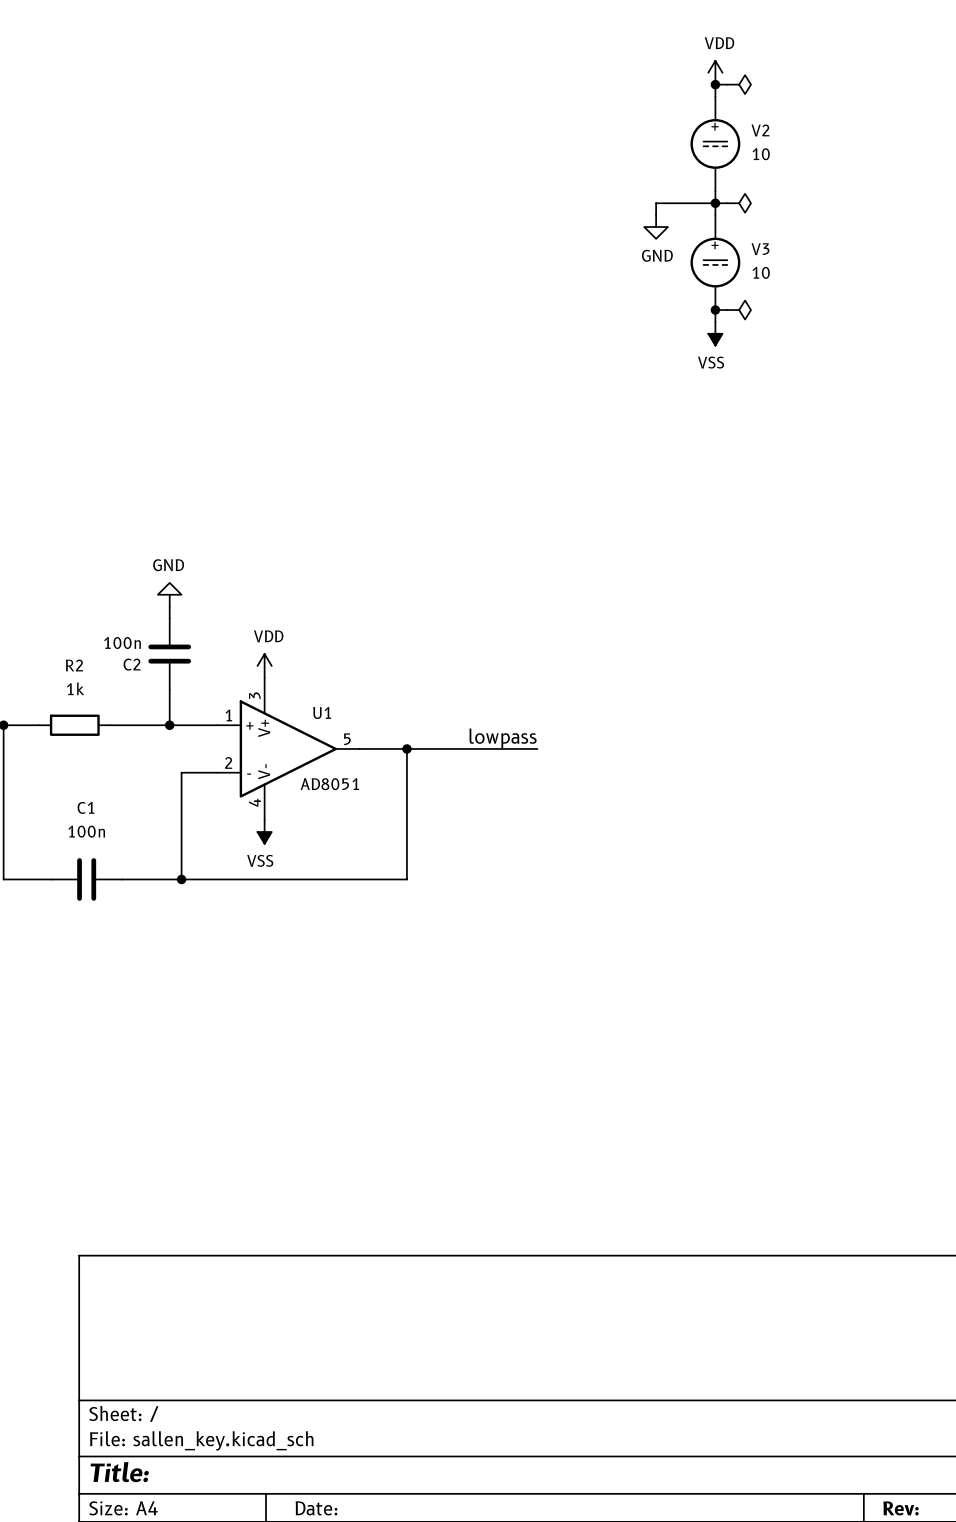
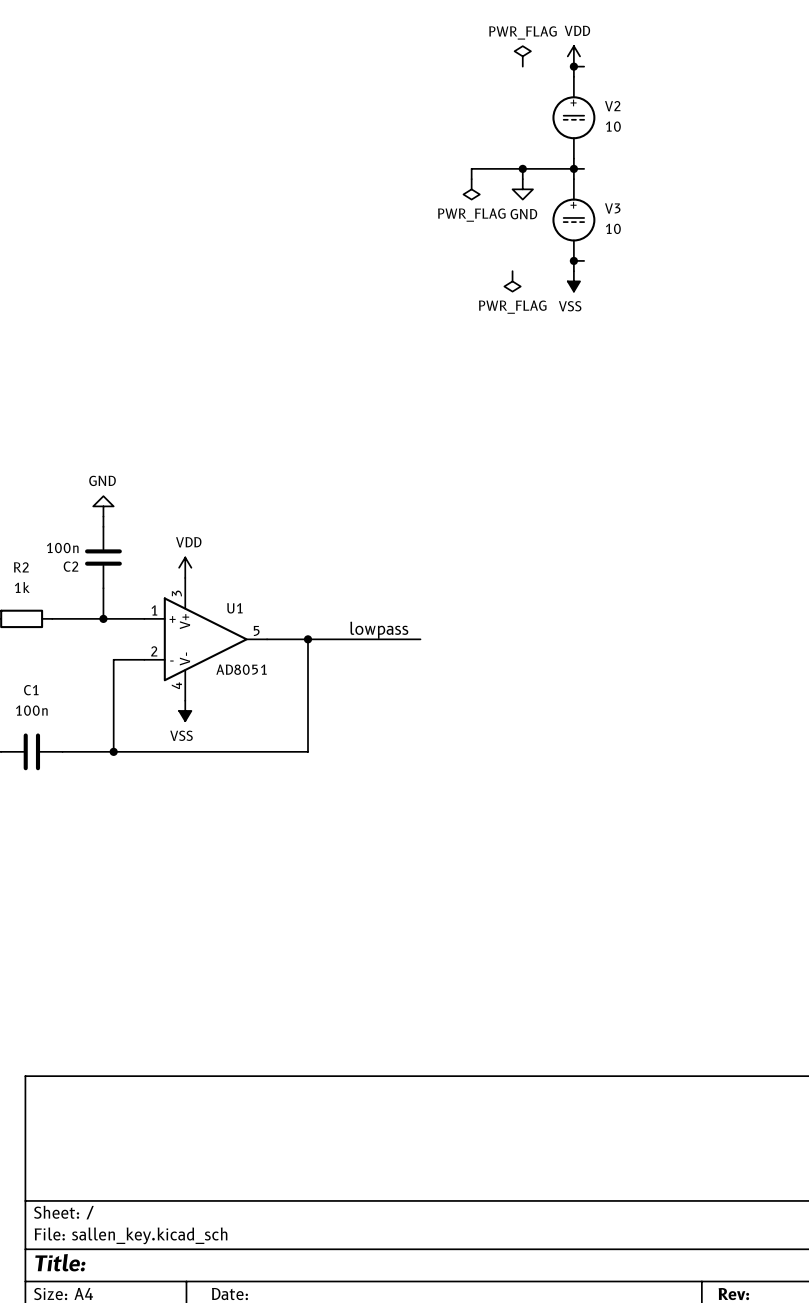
power symbol: none -> PWR_FLAG (522, 56)
power symbol: (739, 84) -> none
wire: none -> (522, 168) (471, 168) (471, 179)
junction: none -> (522, 168)
power symbol: (739, 203) -> none
power symbol: none -> PWR_FLAG (471, 189)
power symbol: (739, 310) -> none
power symbol: none -> PWR_FLAG (512, 281)
label position: lowpass (502, 738) -> lowpass (379, 630)

